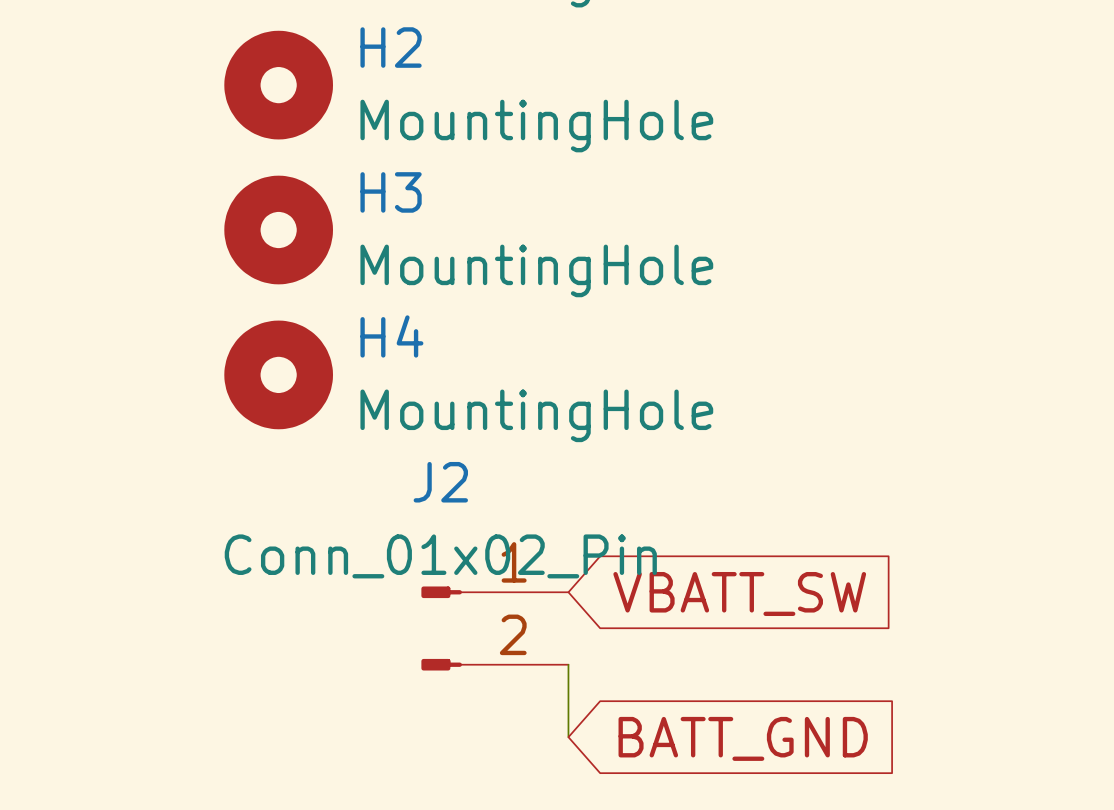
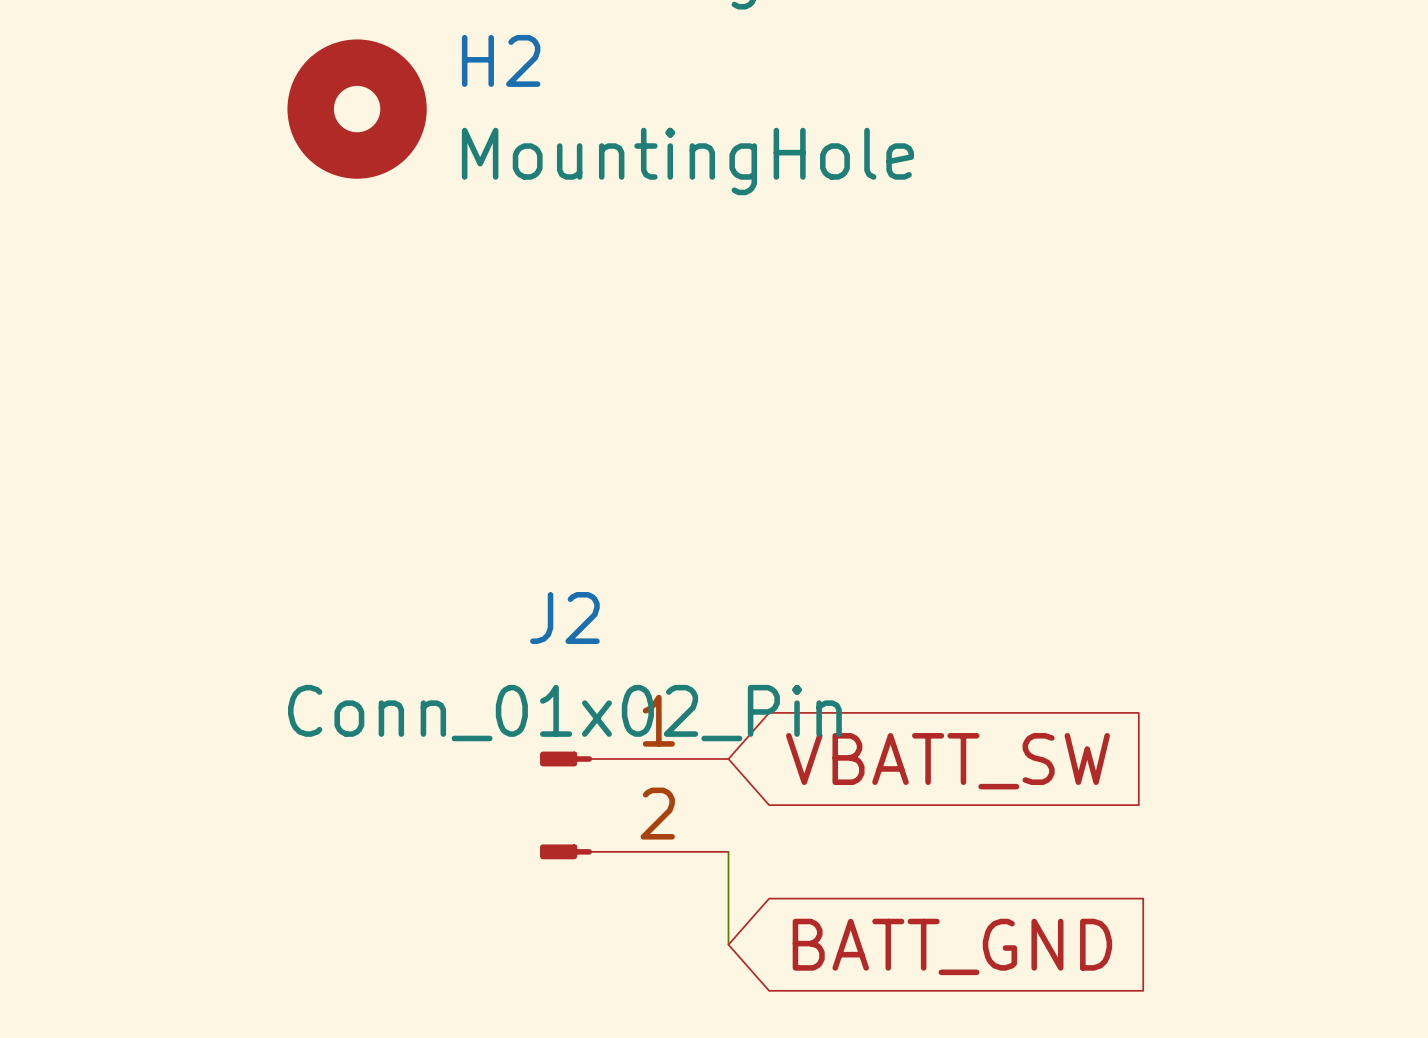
H3: MountingHole (278, 230) -> none
H4: MountingHole (278, 374) -> none

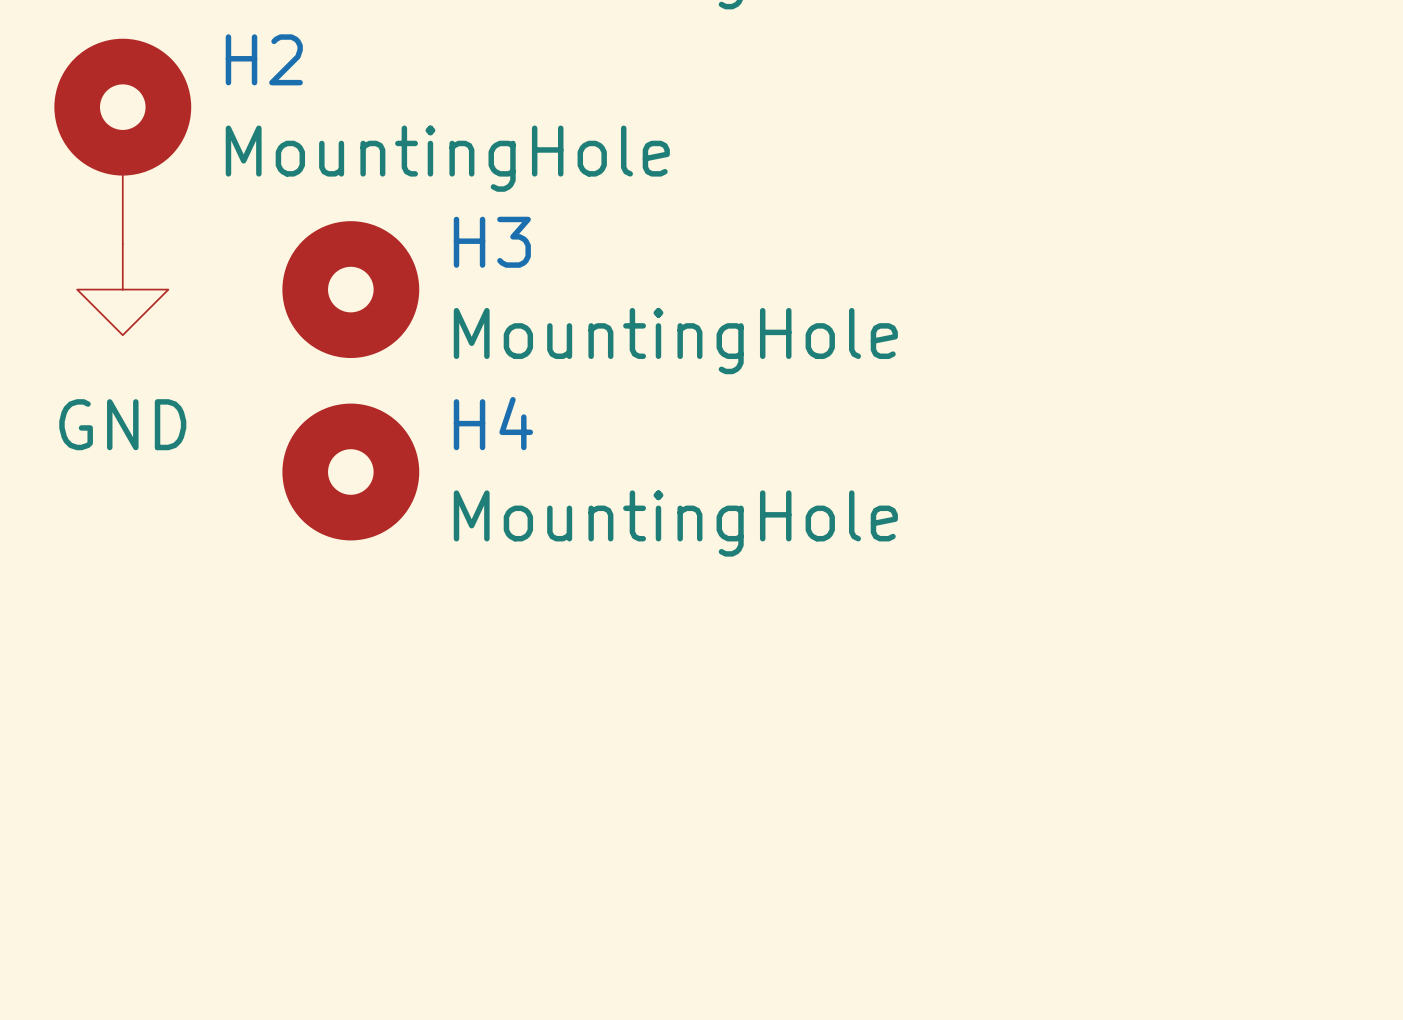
H2 symbol: [287, 39, 427, 179] -> [54, 38, 192, 244]
power symbol: none -> GND (122, 289)
H3: none -> MountingHole (350, 289)
H4: none -> MountingHole (350, 472)
global label: VBATT_SW (947, 761) -> none
J2: Conn_01x02_Pin (634, 805) -> none
wire: (728, 851) (728, 944) -> none
global label: BATT_GND (952, 946) -> none

